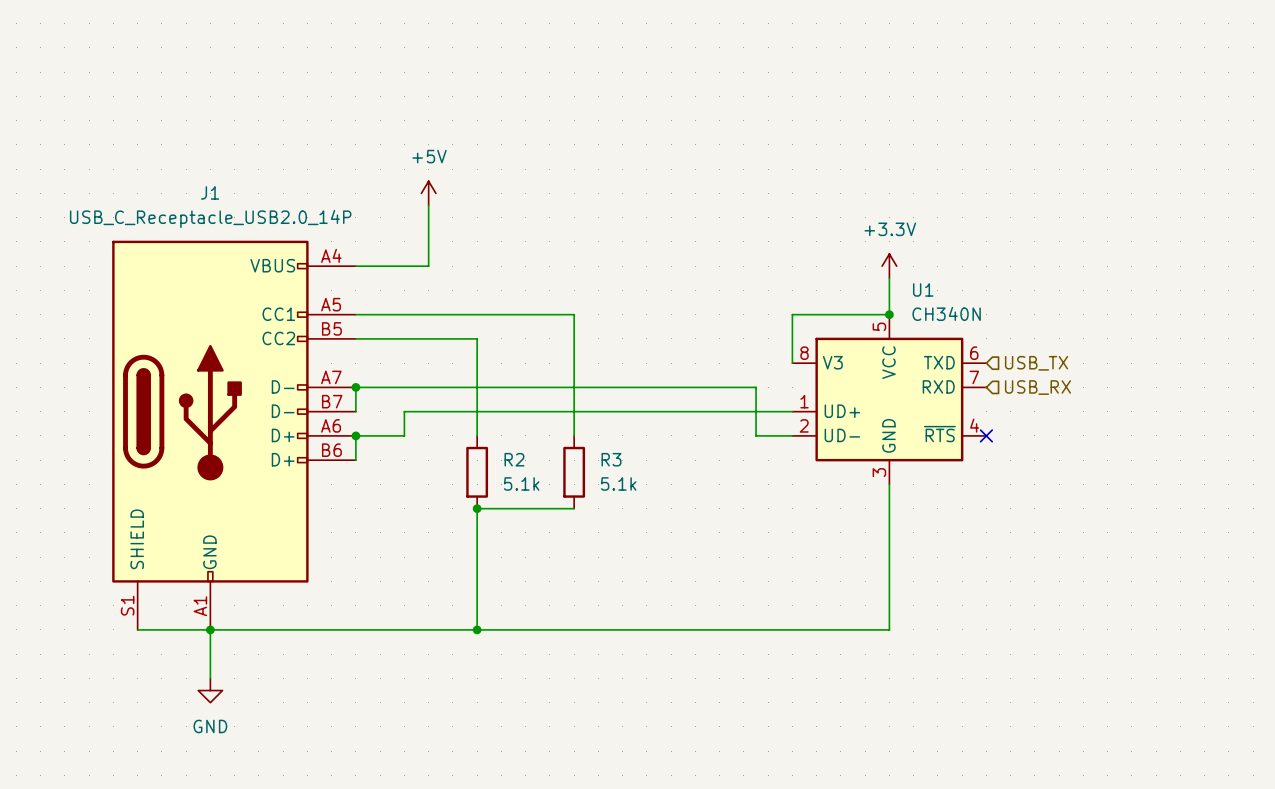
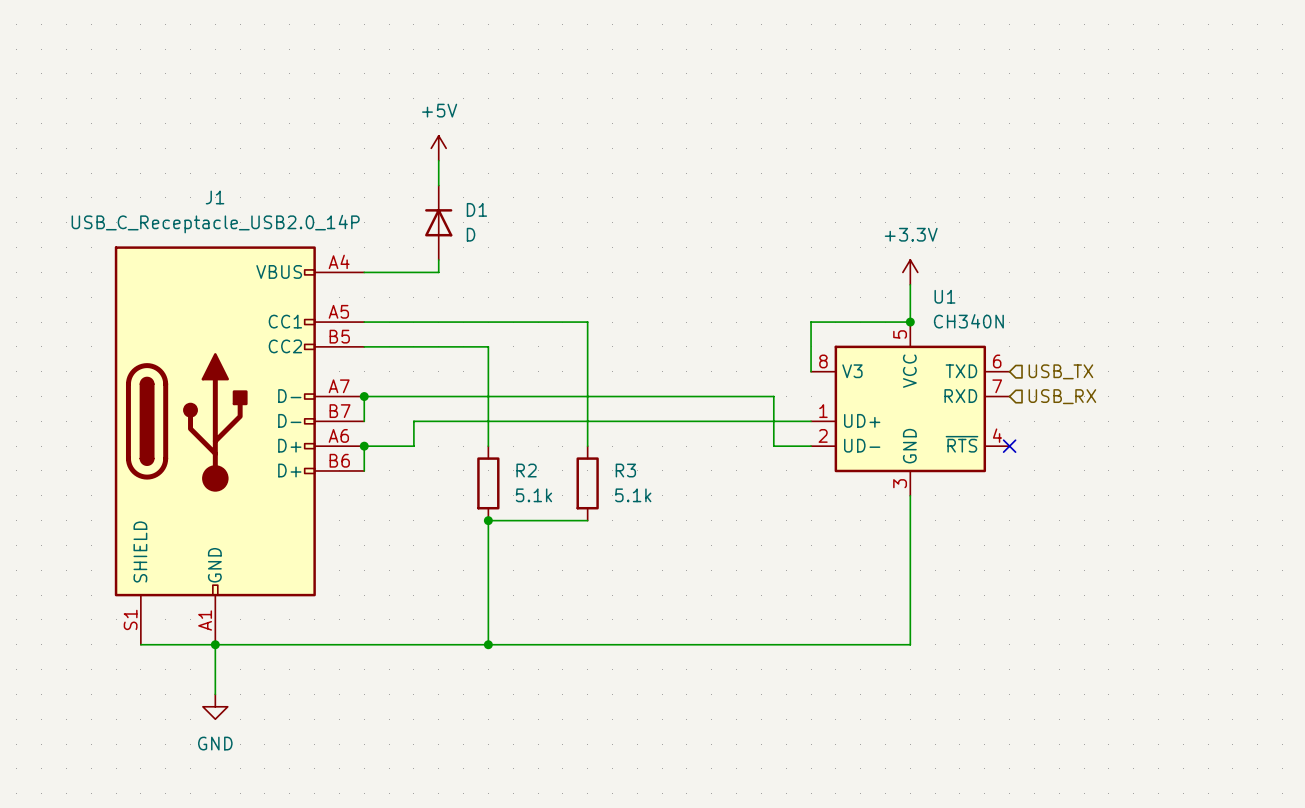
wire: none -> (438, 160) (438, 185)
power symbol position: +5V (428, 193) -> +5V (438, 148)
D1: none -> D (438, 222)

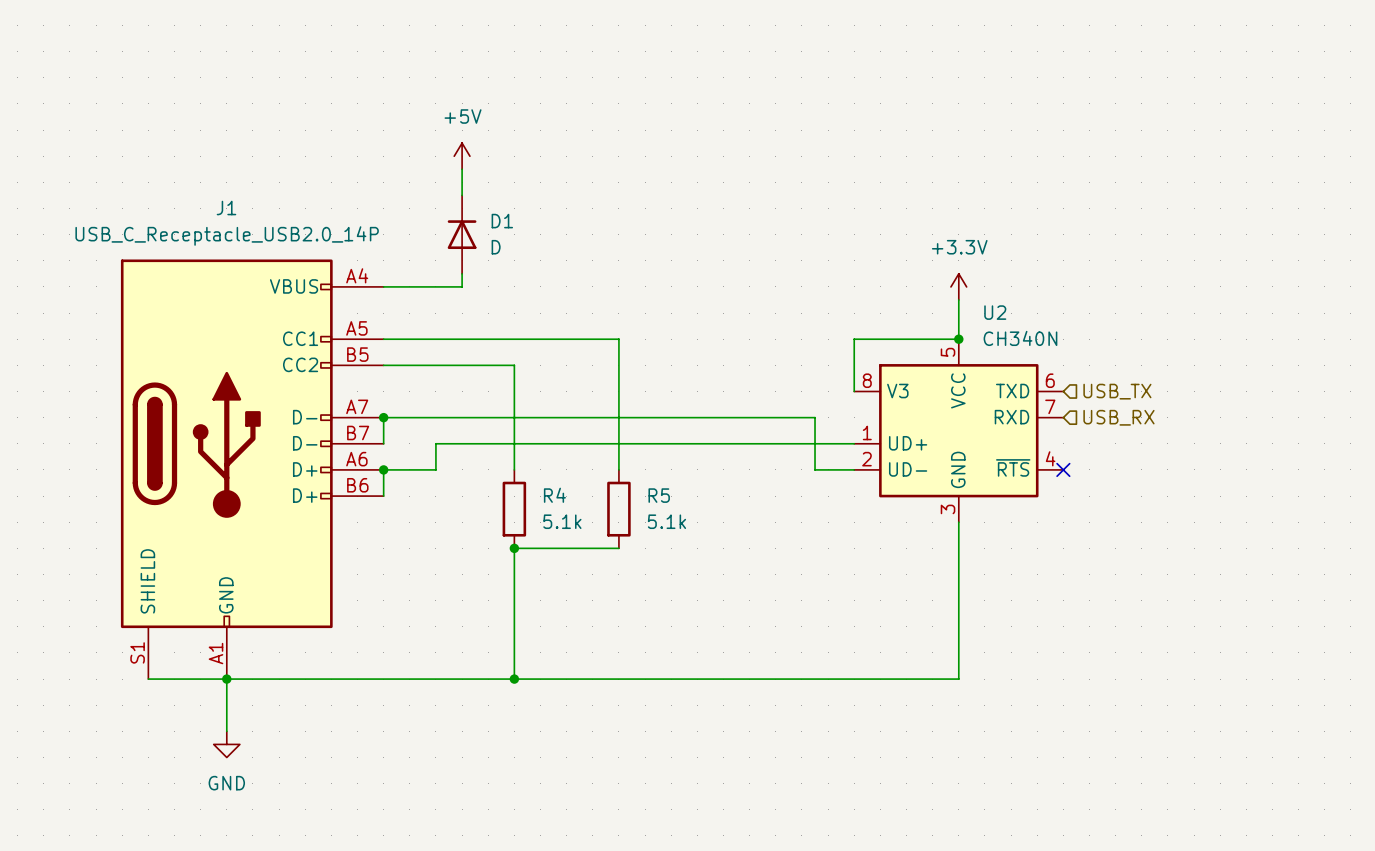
U1 name: U1 (944, 296) -> U2 (995, 312)
R2 name: R2 (526, 470) -> R4 (554, 495)
R3 name: R3 (625, 470) -> R5 (659, 495)

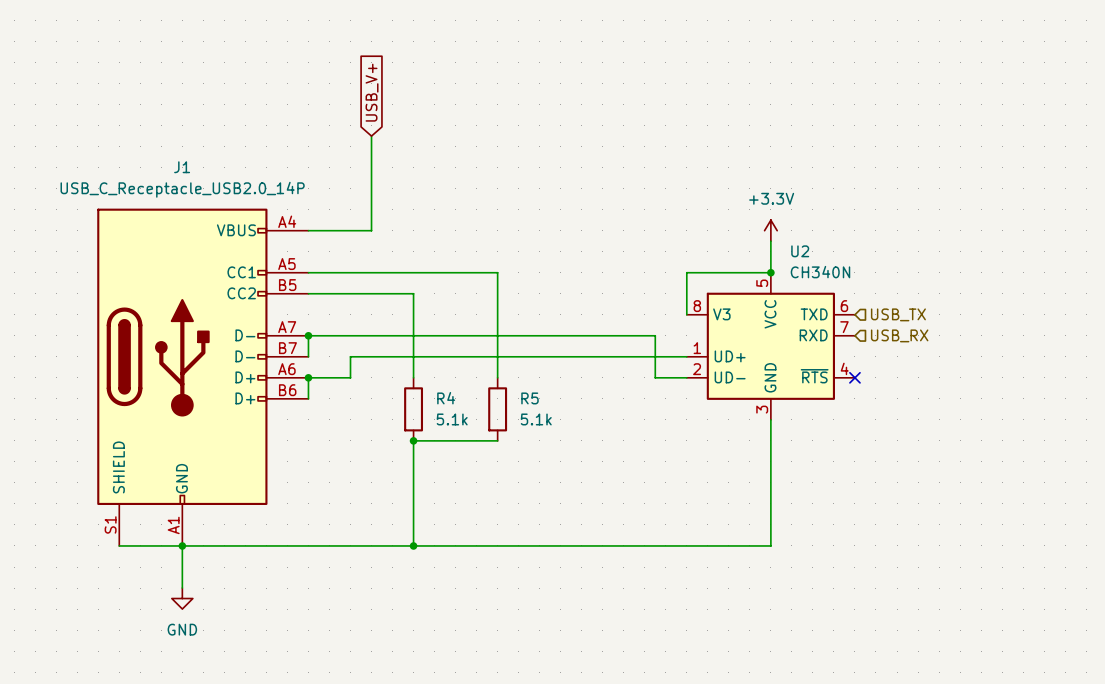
global label: none -> USB_V+ (372, 92)
power symbol: +5V (462, 156) -> none
D1: D (462, 234) -> none

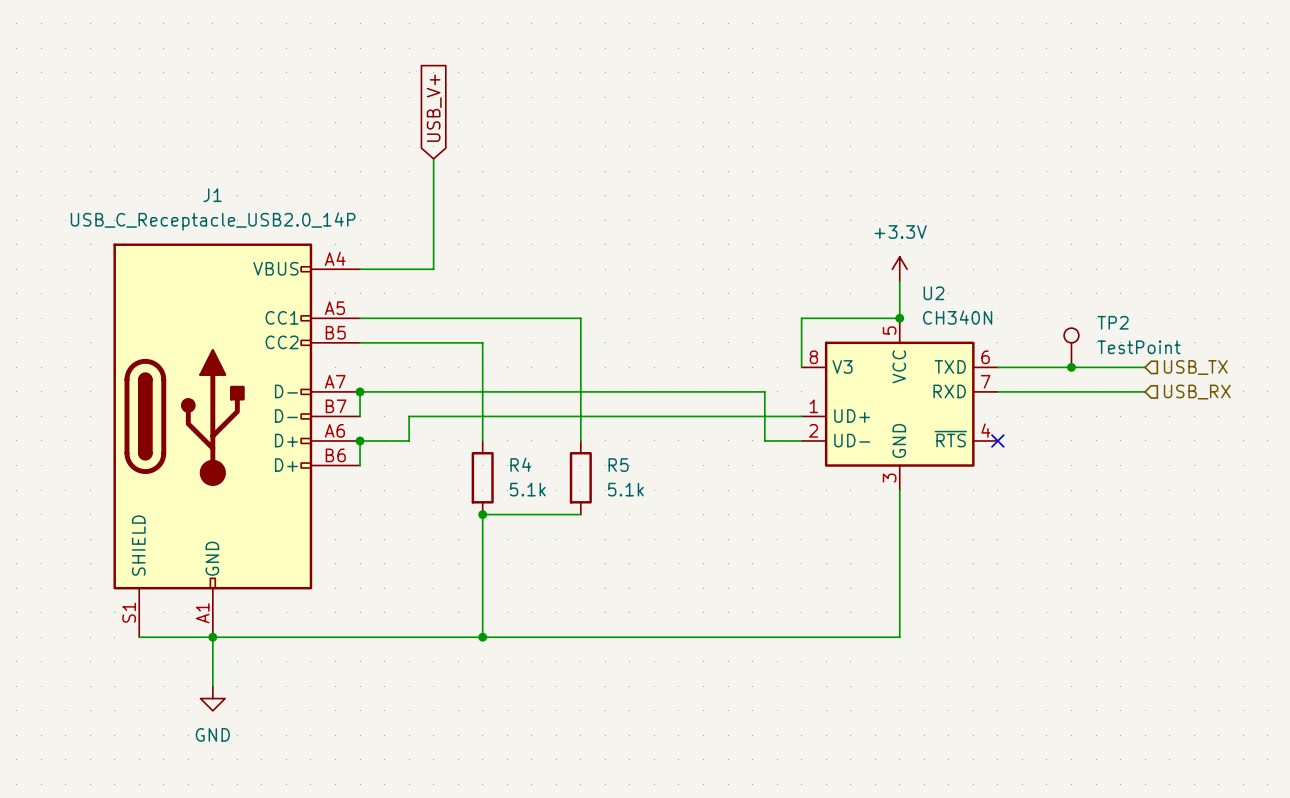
TP2: none -> TestPoint (1071, 347)
wire: none -> (997, 367) (1145, 367)
hierarchical label position: USB_TX (898, 314) -> USB_TX (1195, 367)
junction: none -> (1071, 367)
wire: none -> (997, 391) (1145, 391)
hierarchical label position: USB_RX (899, 335) -> USB_RX (1197, 392)

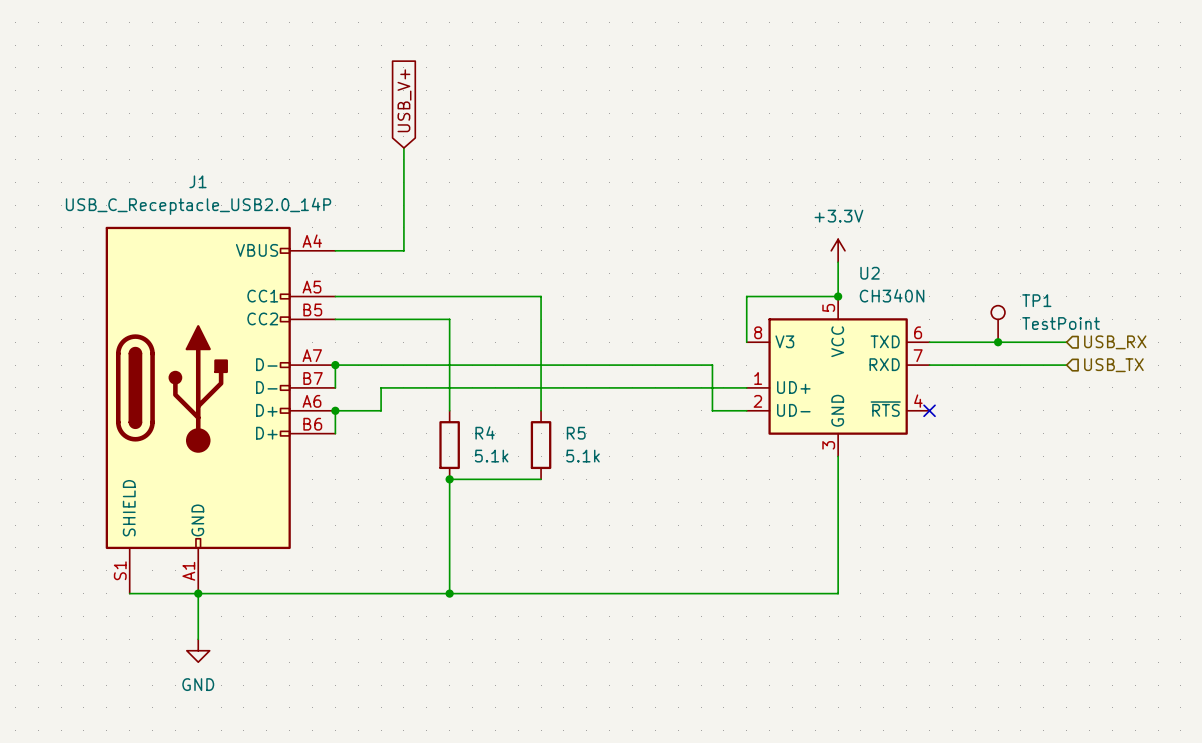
TP2 name: TP2 (1113, 322) -> TP1 (1036, 300)
hierarchical label: USB_TX (1195, 367) -> USB_RX (1115, 342)
hierarchical label: USB_RX (1197, 392) -> USB_TX (1113, 365)

